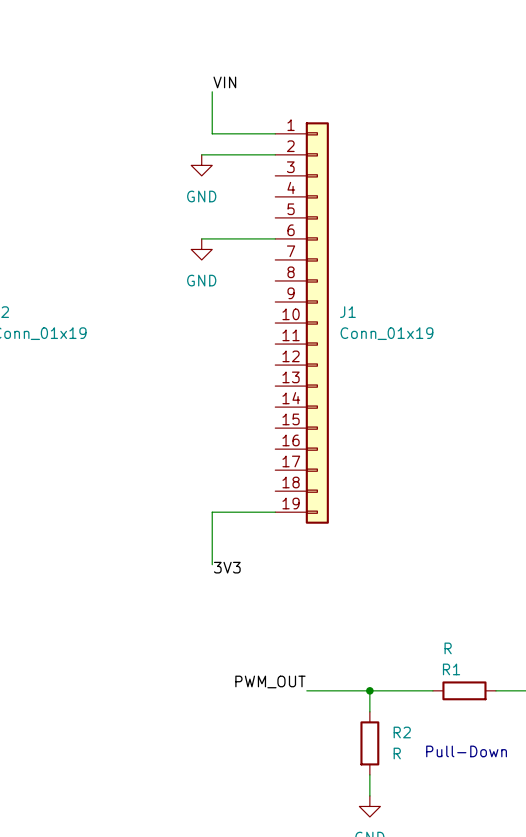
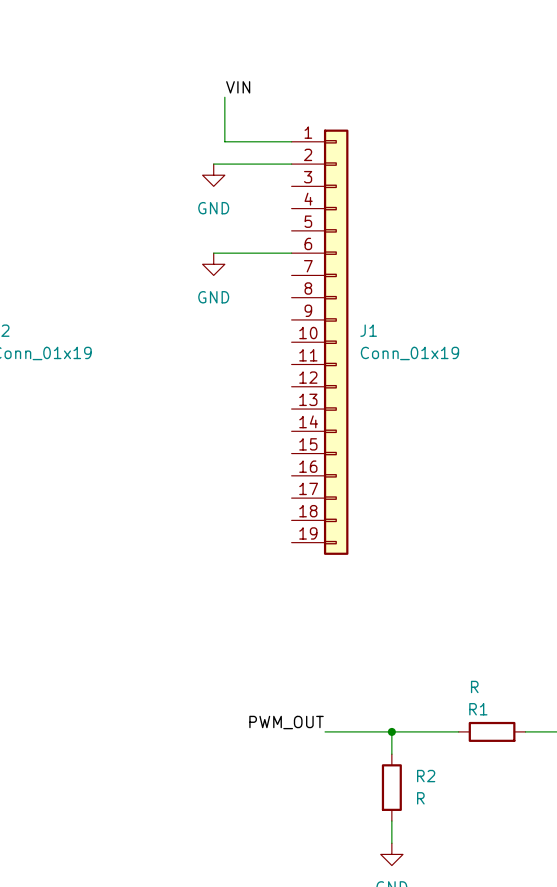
wire: (275, 512) (212, 512) (212, 564) -> none
label: 3V3 (227, 567) -> none
text: Pull-Down (466, 751) -> none

